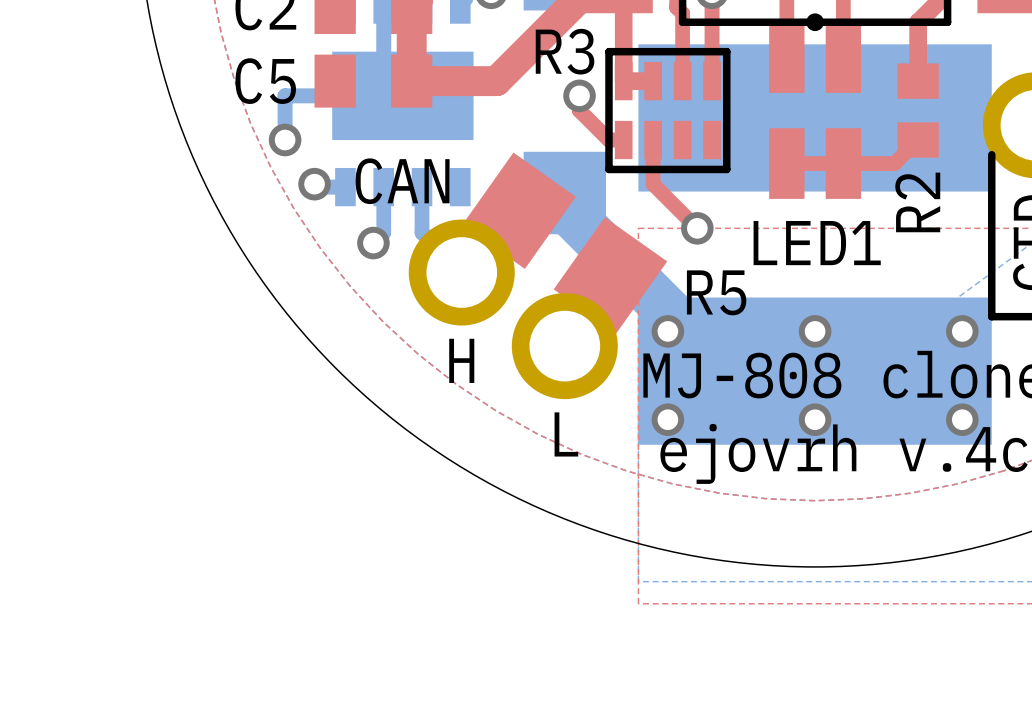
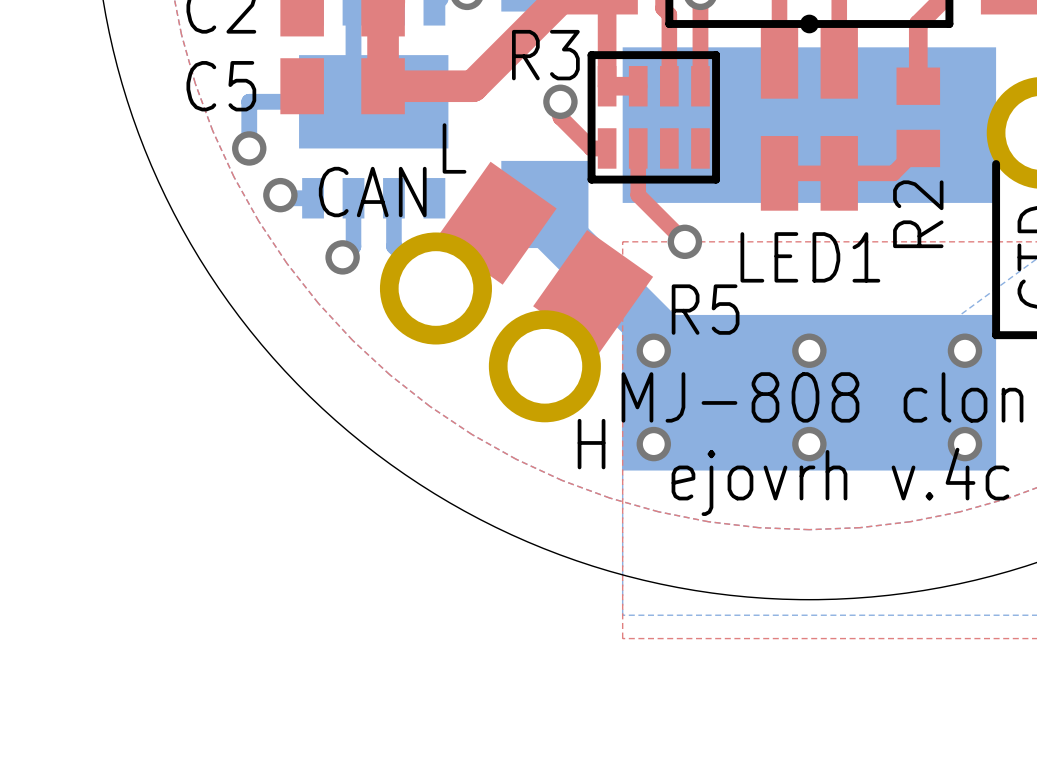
text position: H (461, 360) -> H (591, 444)
text position: L (566, 434) -> L (454, 148)

